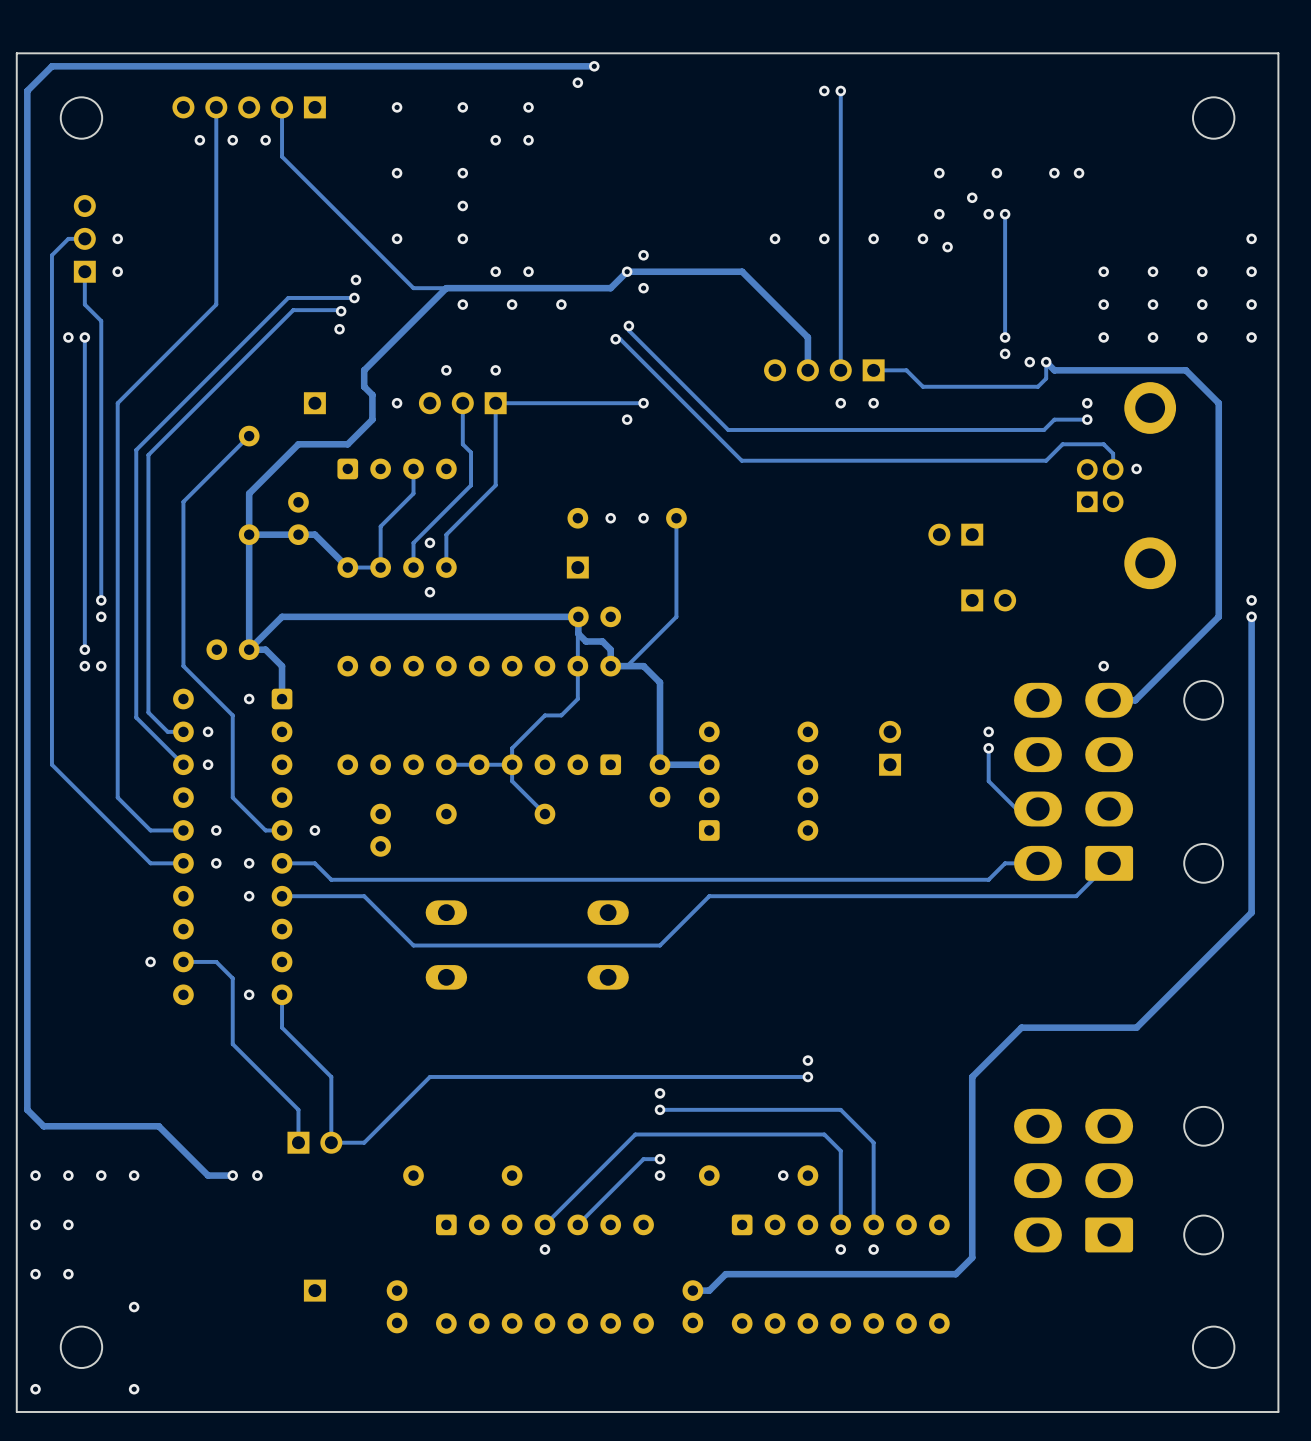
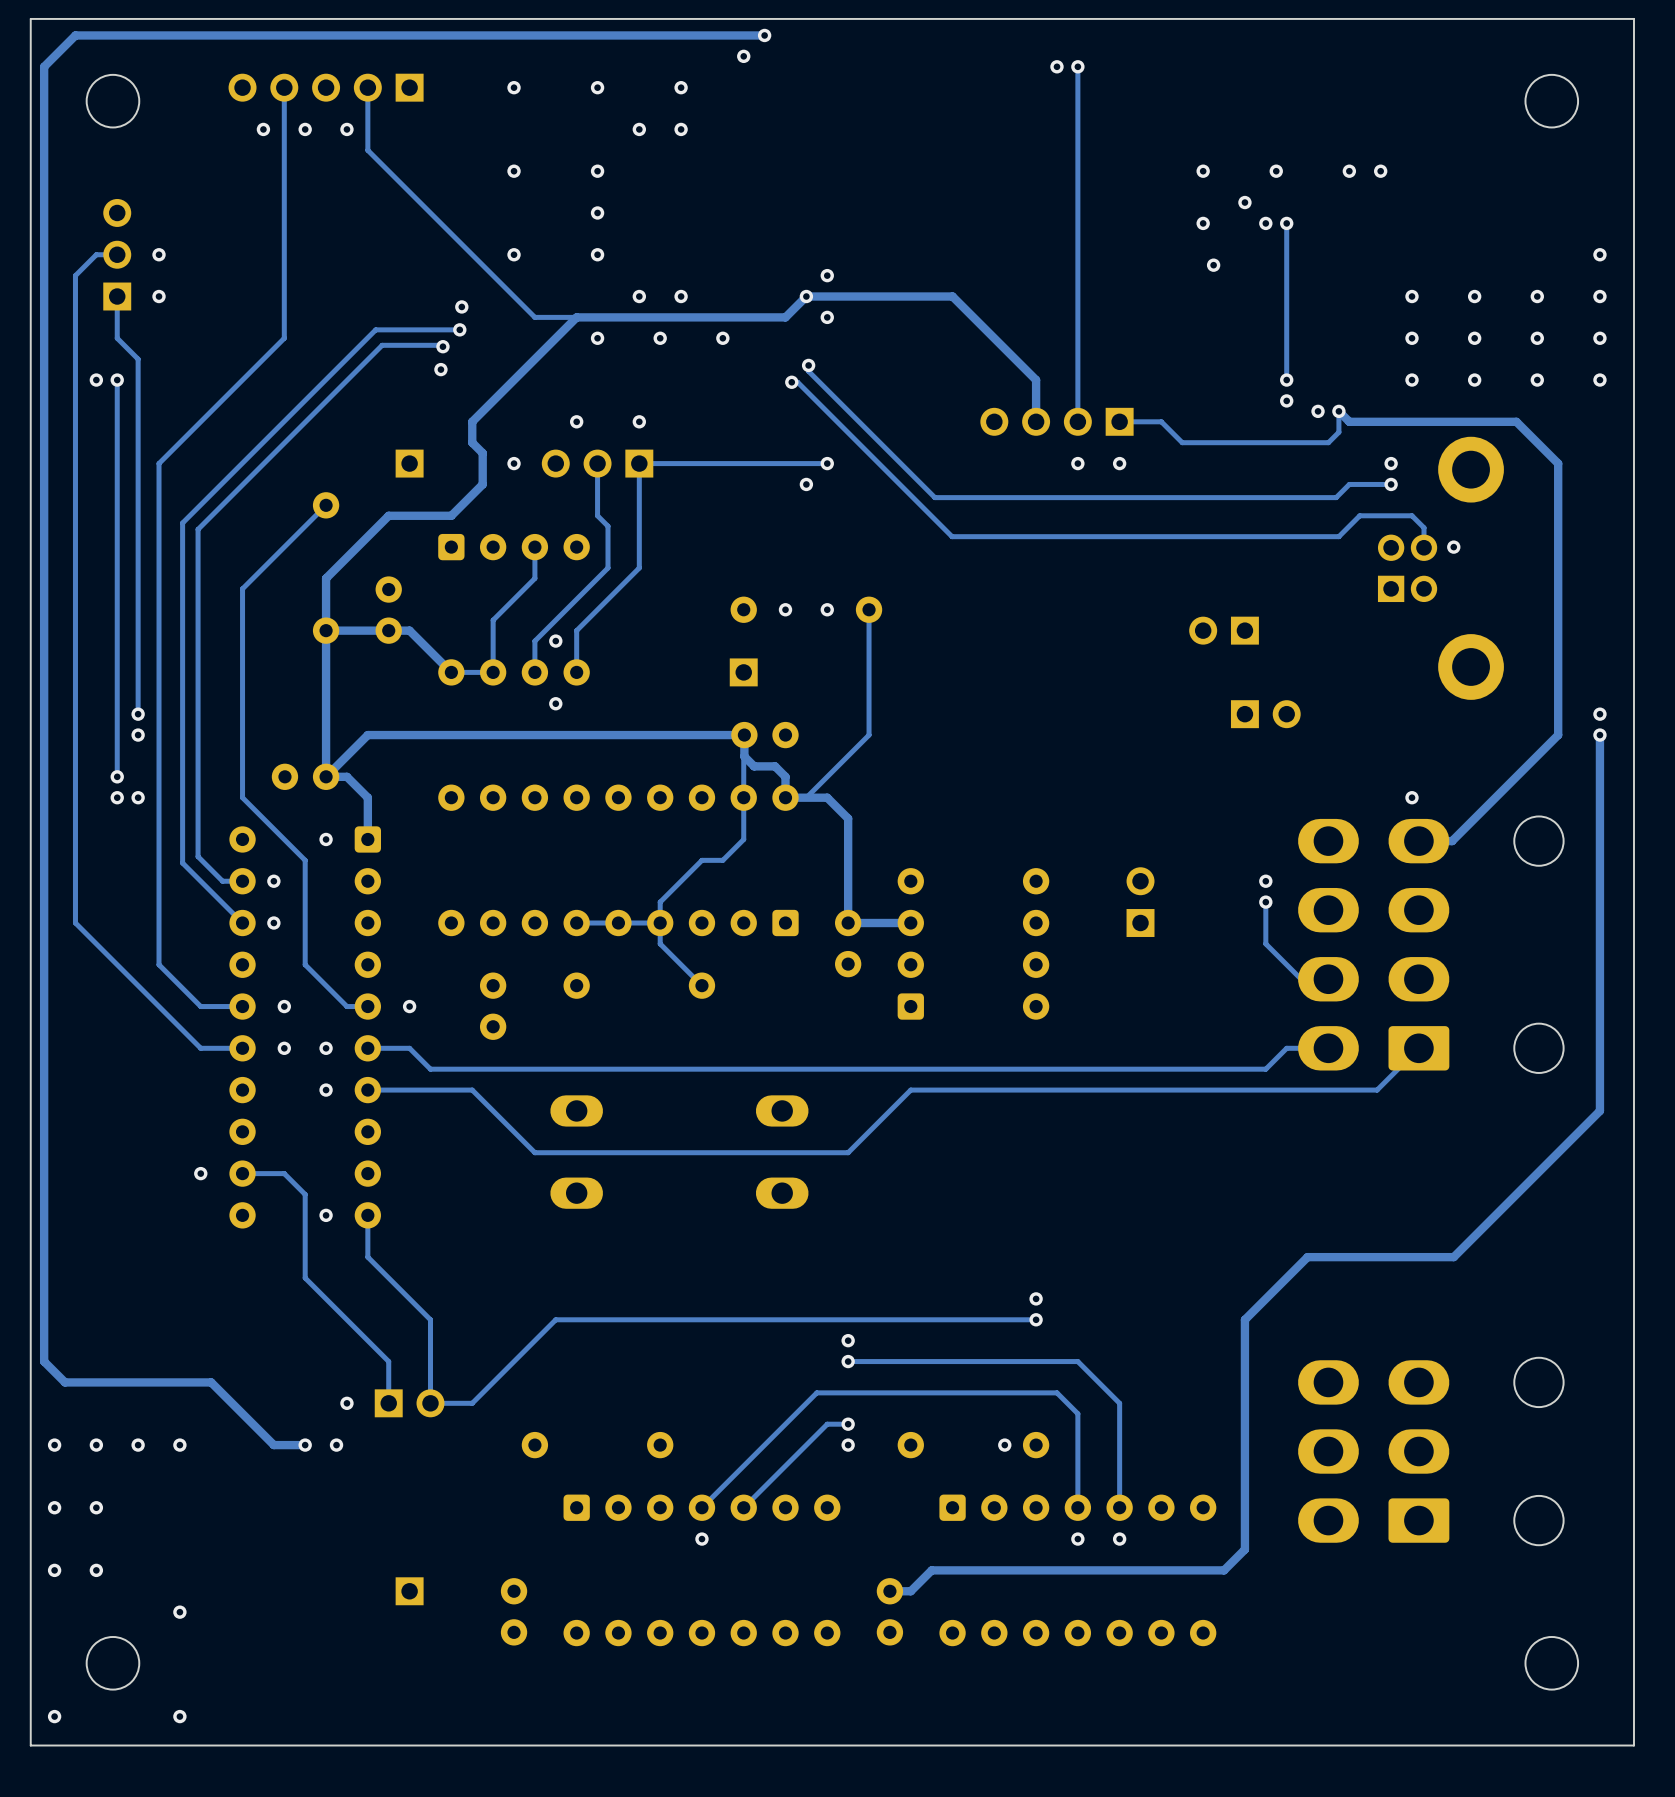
via: (775, 238) -> none
via: (824, 238) -> none
via: (873, 238) -> none
via: (922, 238) -> none
via: none -> (346, 1403)

